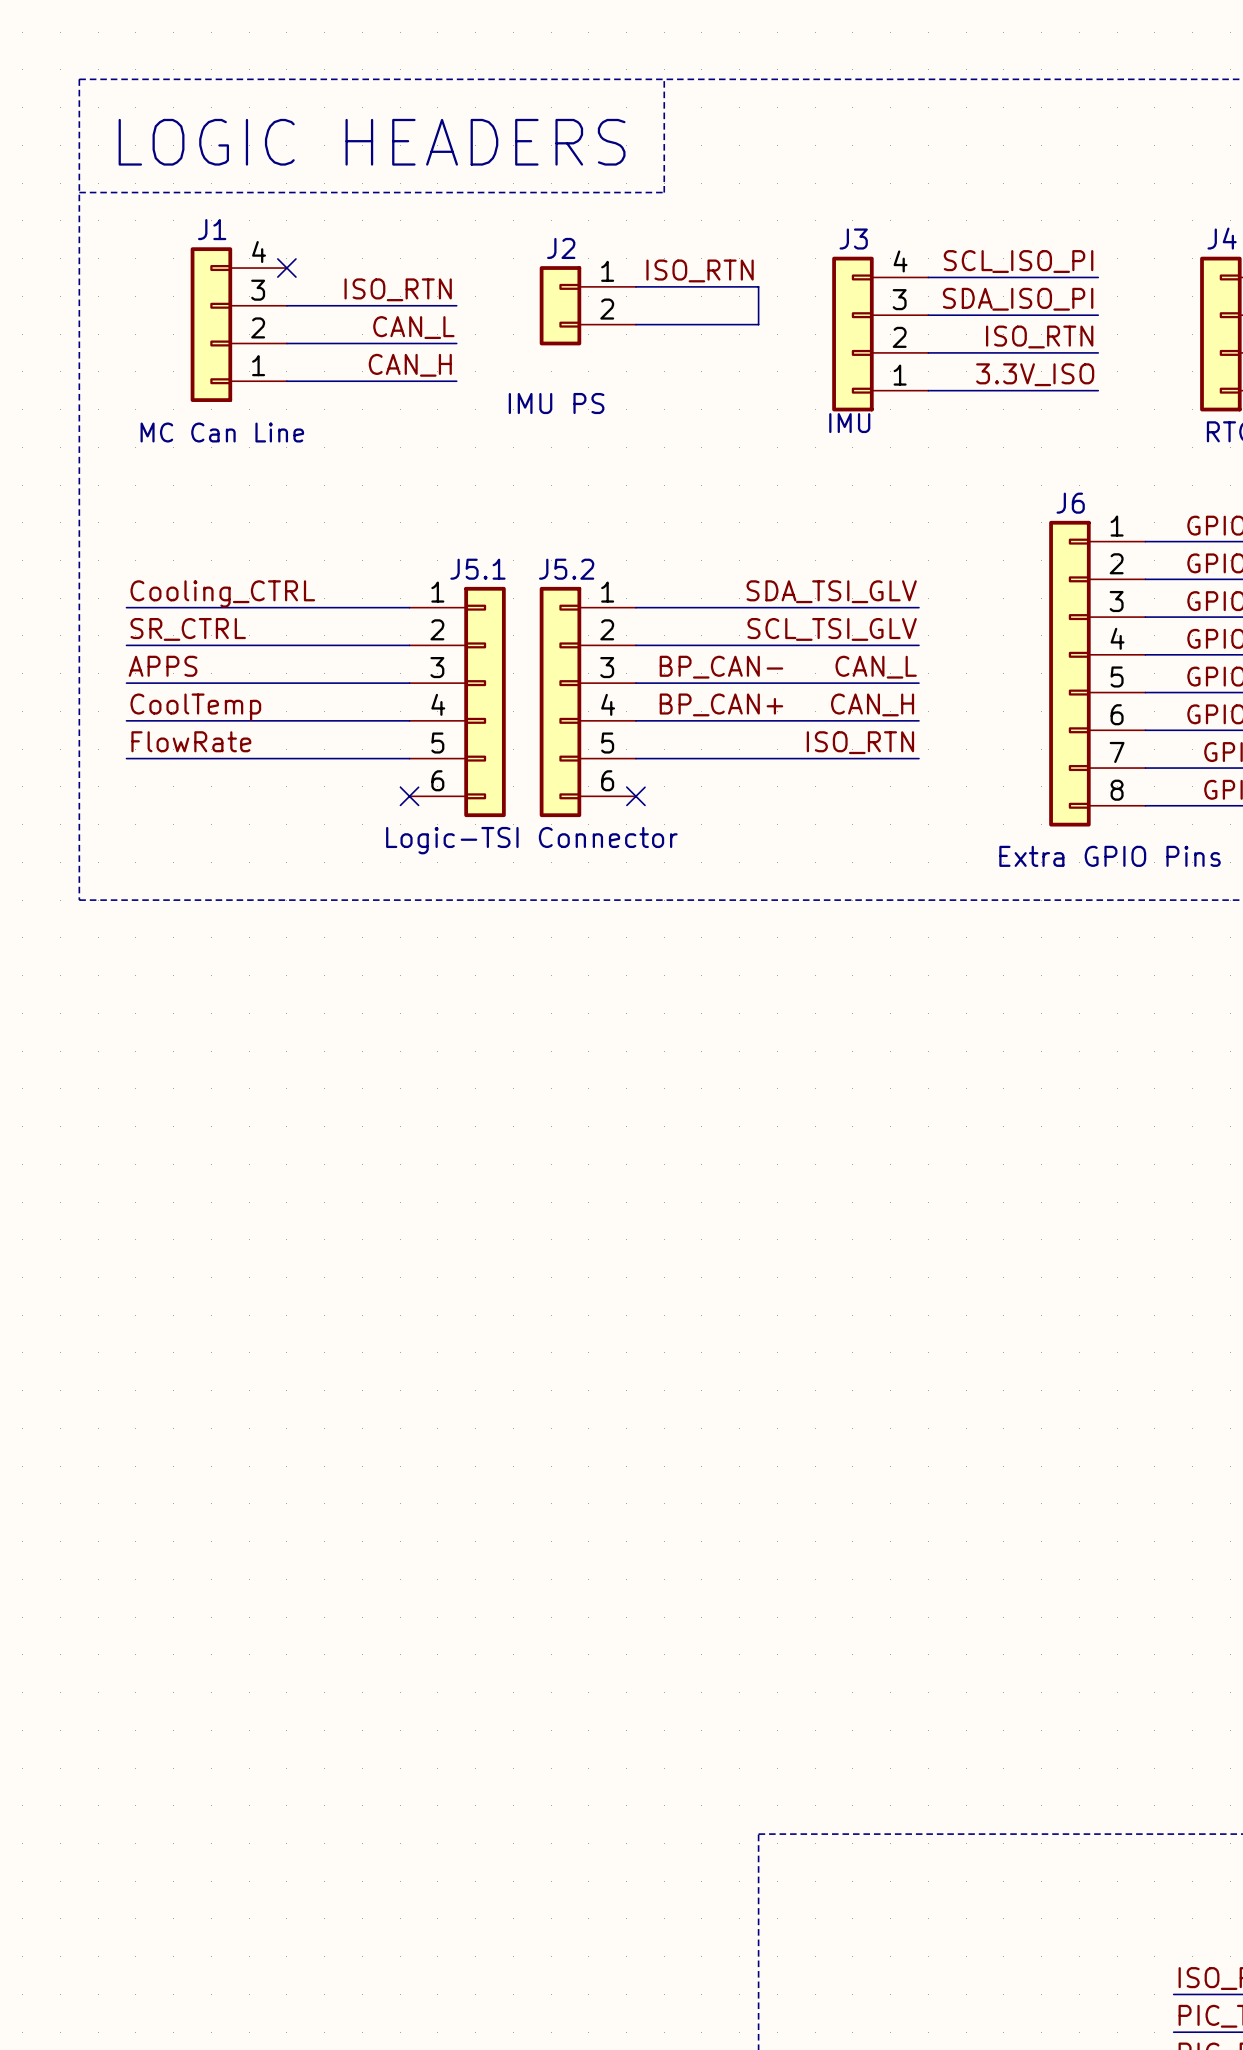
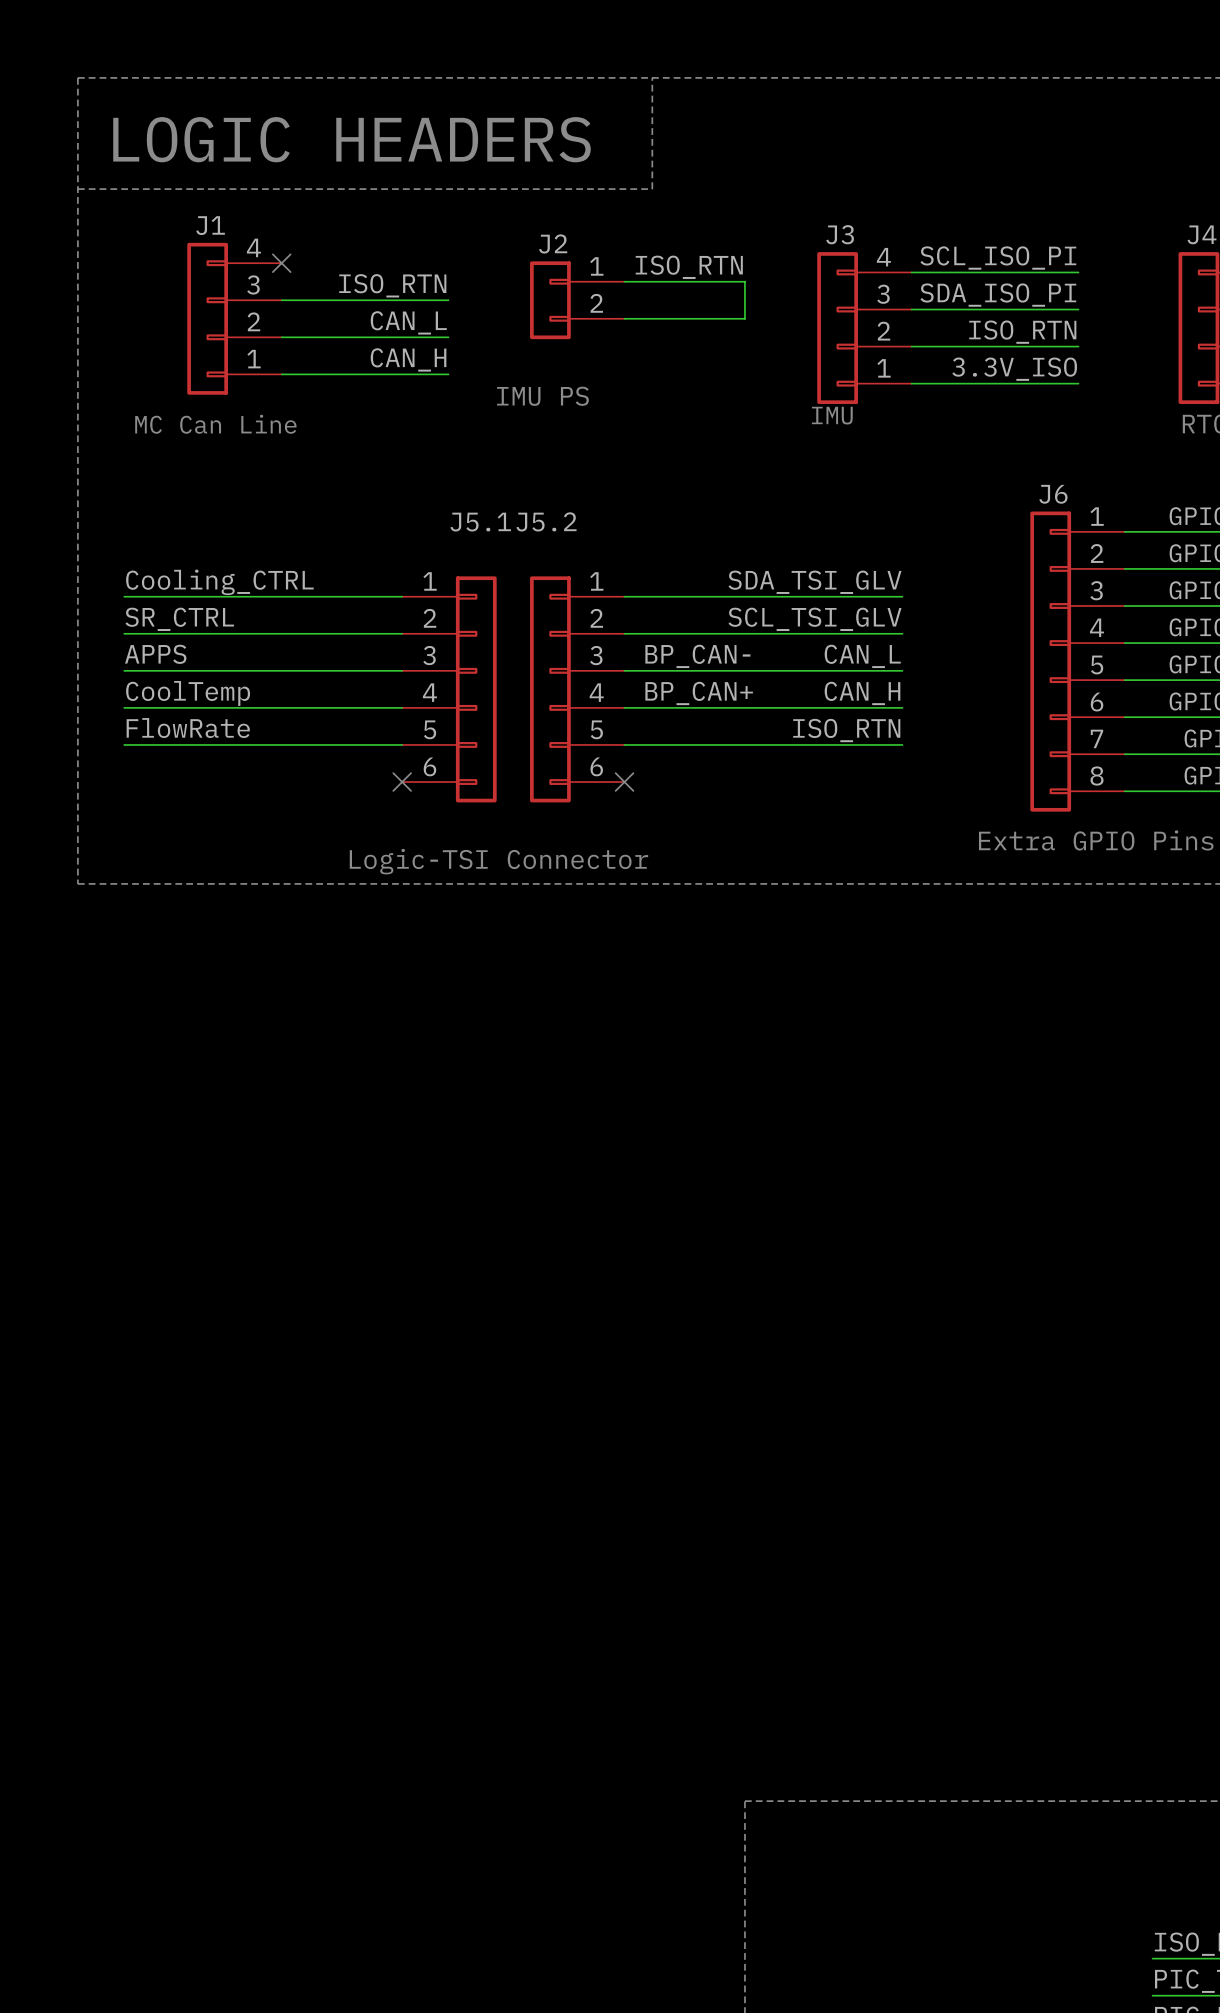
J5.1 name position: J5.1 (477, 569) -> J5.1 (480, 522)
J5.2 name position: J5.2 (566, 569) -> J5.2 (546, 521)
text position: Logic-TSI Connector (531, 840) -> Logic-TSI Connector (498, 861)

